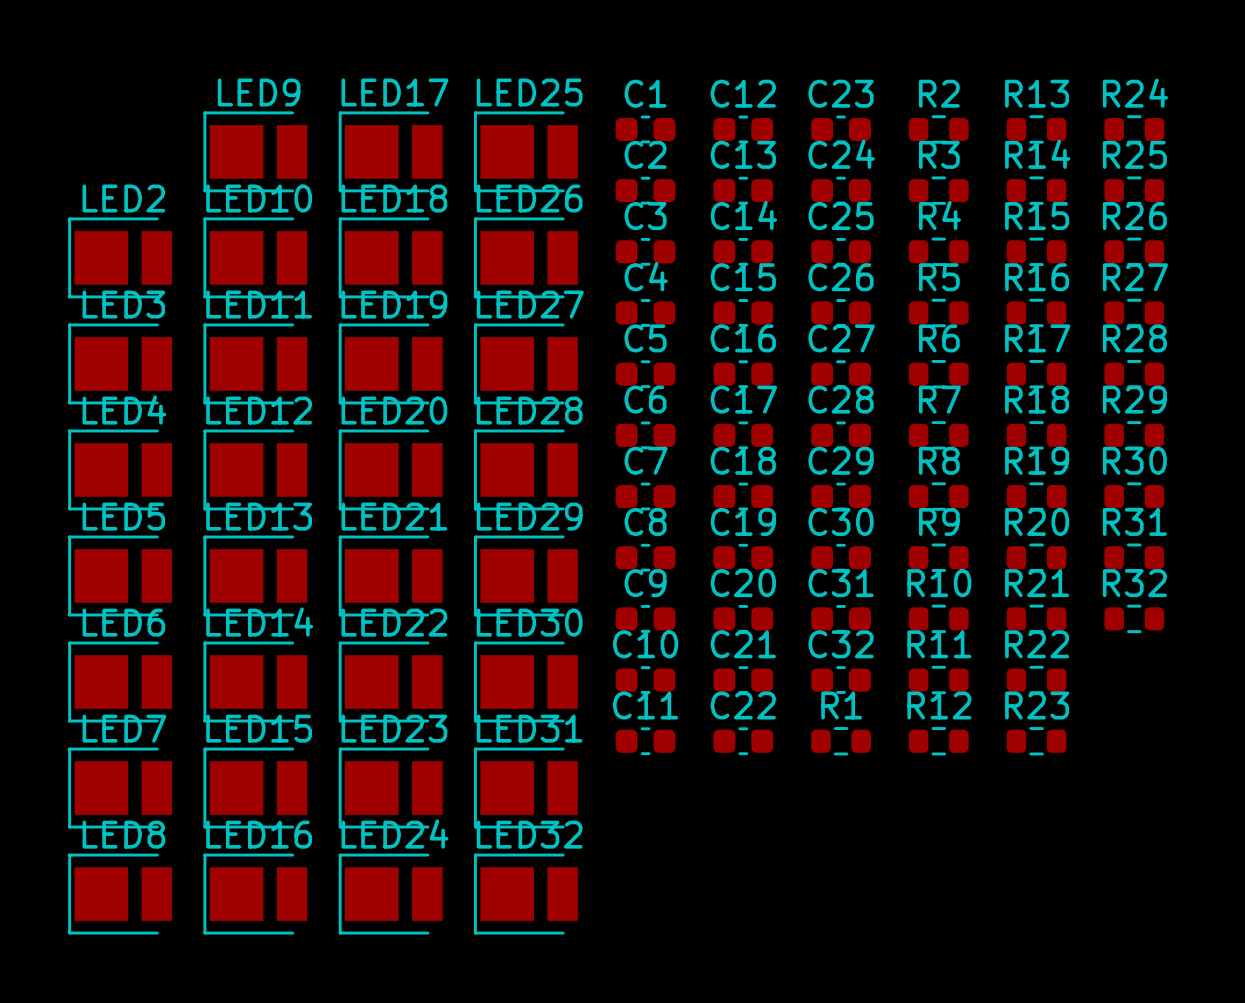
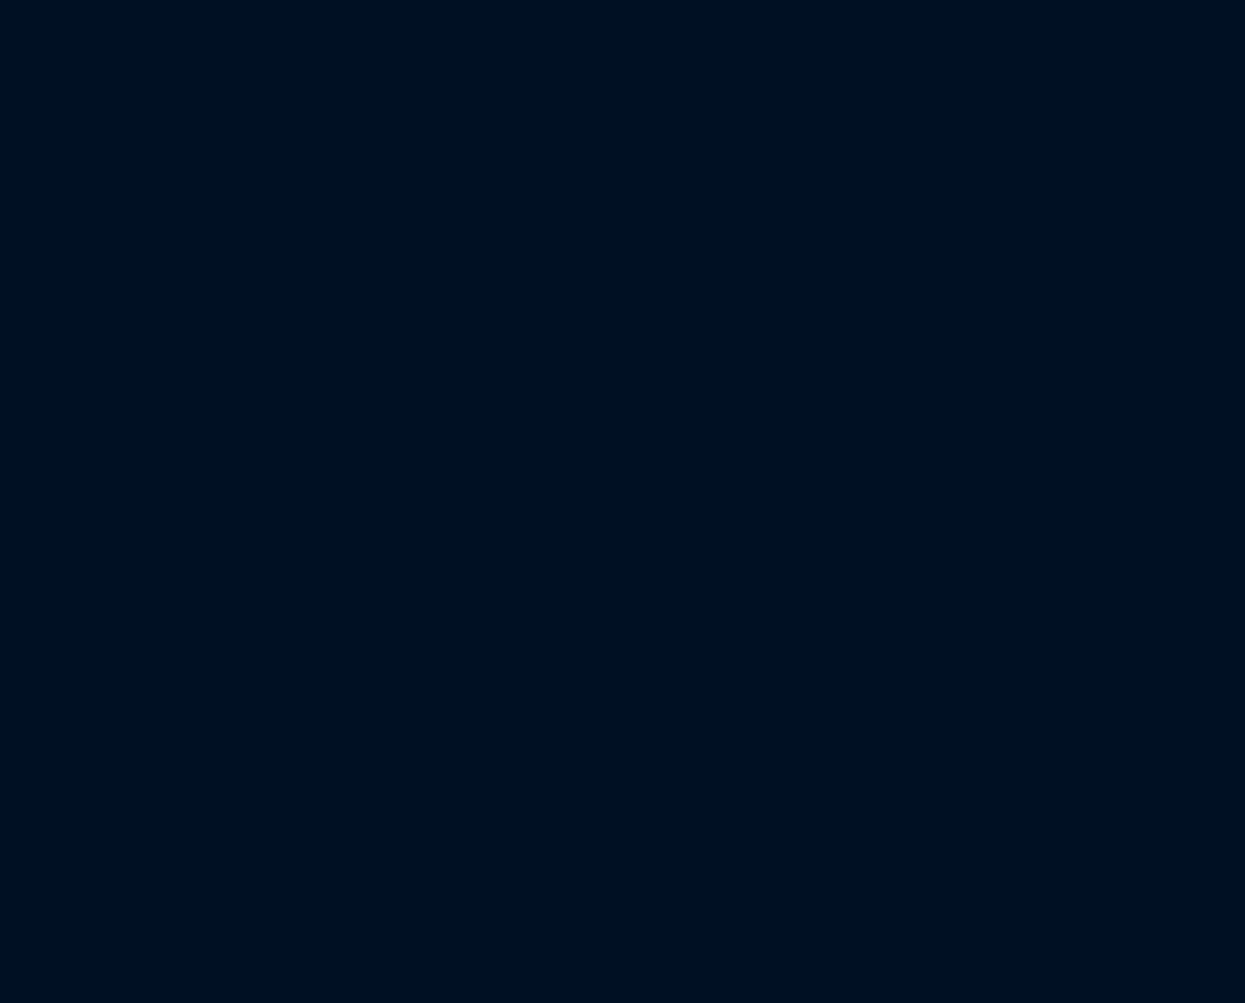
C1: (645, 129) -> none
C12: (743, 129) -> none
C23: (841, 129) -> none
R2: (938, 129) -> none
R13: (1036, 129) -> none
R24: (1134, 129) -> none
LED9: (255, 151) -> none
LED17: (390, 151) -> none
LED25: (525, 151) -> none
C2: (645, 190) -> none
C13: (743, 190) -> none
C24: (841, 190) -> none
R3: (938, 190) -> none
R14: (1036, 190) -> none
R25: (1134, 190) -> none
C3: (645, 251) -> none
C14: (743, 251) -> none
C25: (841, 251) -> none
R4: (938, 251) -> none
R15: (1036, 251) -> none
R26: (1134, 251) -> none
LED2: (120, 257) -> none
LED10: (255, 257) -> none
LED18: (390, 257) -> none
LED26: (525, 257) -> none
C4: (645, 312) -> none
C15: (743, 312) -> none
C26: (841, 312) -> none
R5: (938, 312) -> none
R16: (1036, 312) -> none
R27: (1134, 312) -> none
LED3: (120, 363) -> none
LED11: (255, 363) -> none
LED19: (390, 363) -> none
LED27: (525, 363) -> none
C5: (645, 374) -> none
C16: (743, 374) -> none
C27: (841, 374) -> none
R6: (938, 374) -> none
R17: (1036, 374) -> none
R28: (1134, 374) -> none
C6: (645, 435) -> none
C17: (743, 435) -> none
C28: (841, 435) -> none
R7: (938, 435) -> none
R18: (1036, 435) -> none
R29: (1134, 435) -> none
LED4: (120, 469) -> none
LED12: (255, 469) -> none
LED20: (390, 469) -> none
LED28: (525, 469) -> none
C7: (645, 496) -> none
C18: (743, 496) -> none
C29: (841, 496) -> none
R8: (938, 496) -> none
R19: (1036, 496) -> none
R30: (1134, 496) -> none
C8: (645, 557) -> none
C19: (743, 557) -> none
C30: (841, 557) -> none
R9: (938, 557) -> none
R20: (1036, 557) -> none
R31: (1134, 557) -> none
LED5: (120, 575) -> none
LED13: (255, 575) -> none
LED21: (390, 575) -> none
LED29: (525, 575) -> none
C9: (645, 618) -> none
C20: (743, 618) -> none
C31: (841, 618) -> none
R10: (938, 618) -> none
R21: (1036, 618) -> none
R32: (1134, 618) -> none
C10: (645, 680) -> none
C21: (743, 680) -> none
C32: (841, 680) -> none
R11: (938, 680) -> none
R22: (1036, 680) -> none
LED6: (120, 682) -> none
LED14: (255, 682) -> none
LED22: (390, 682) -> none
LED30: (525, 682) -> none
C11: (645, 741) -> none
C22: (743, 741) -> none
R1: (841, 741) -> none
R12: (938, 741) -> none
R23: (1036, 741) -> none
LED7: (120, 788) -> none
LED15: (255, 788) -> none
LED23: (390, 788) -> none
LED31: (525, 788) -> none
LED8: (120, 894) -> none
LED16: (255, 894) -> none
LED24: (390, 894) -> none
LED32: (525, 894) -> none

